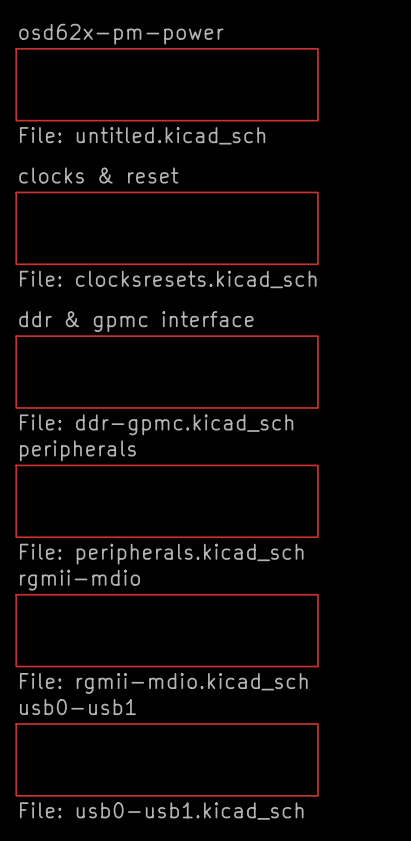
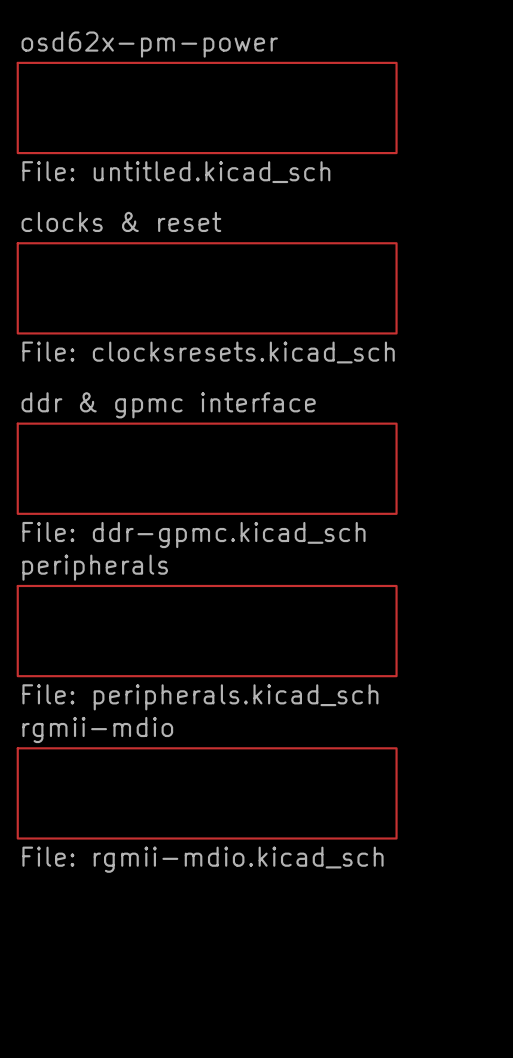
sheet usb0-usb1: File: usb0-usb1.kicad_sch (167, 759) -> none

